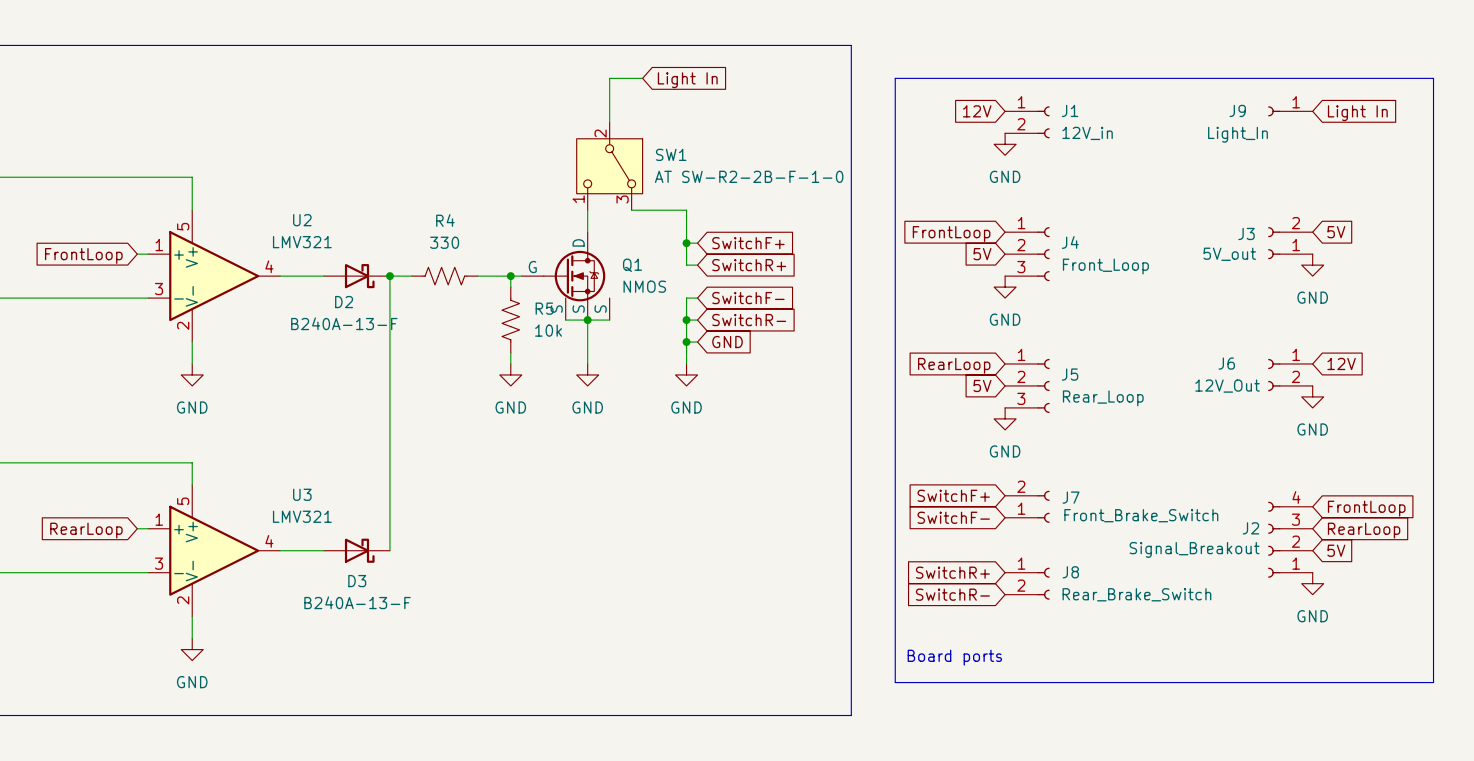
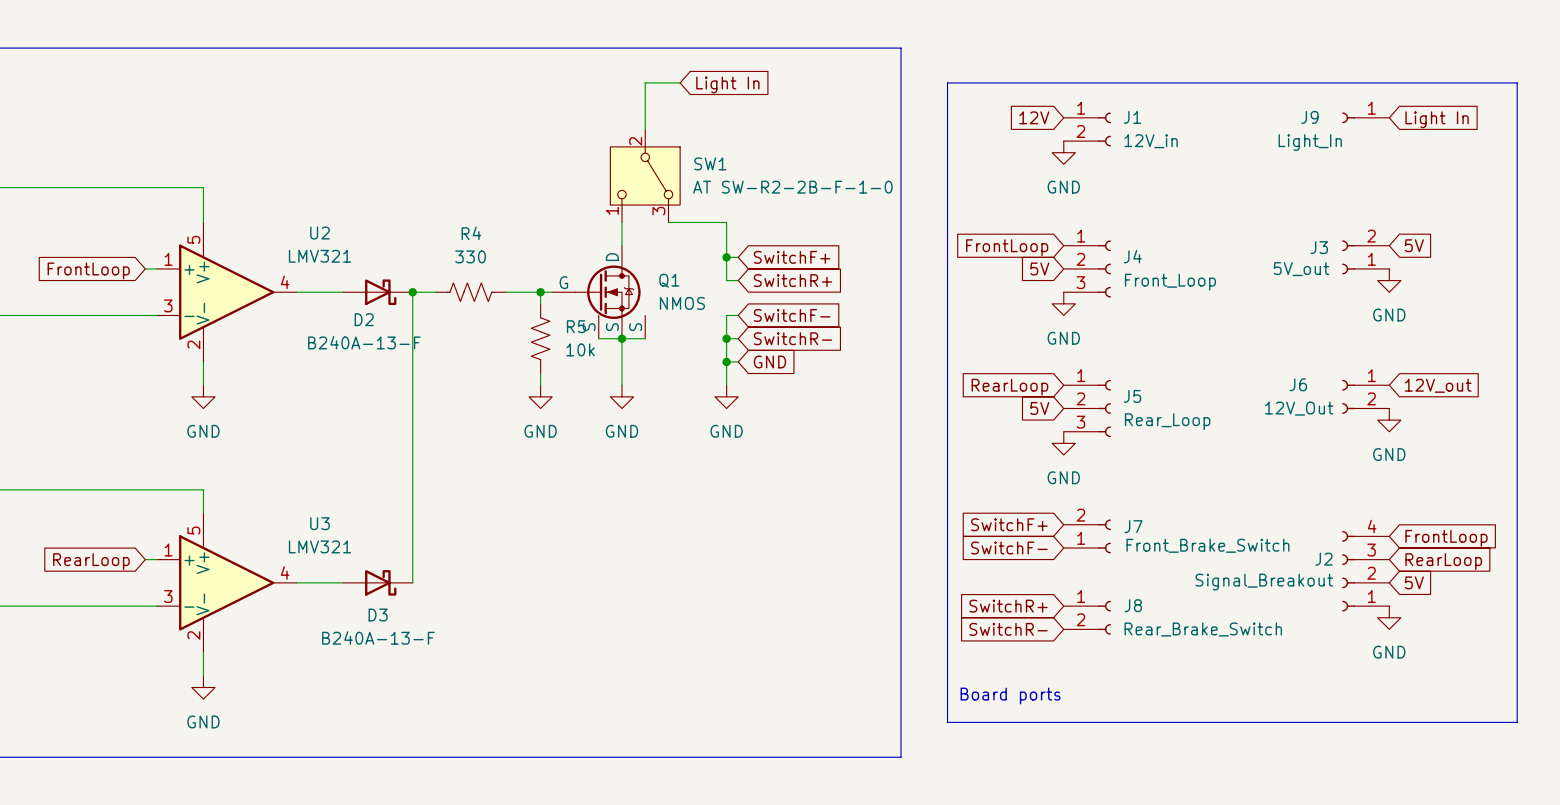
global label: 12V (1341, 363) -> 12V_out (1438, 385)

